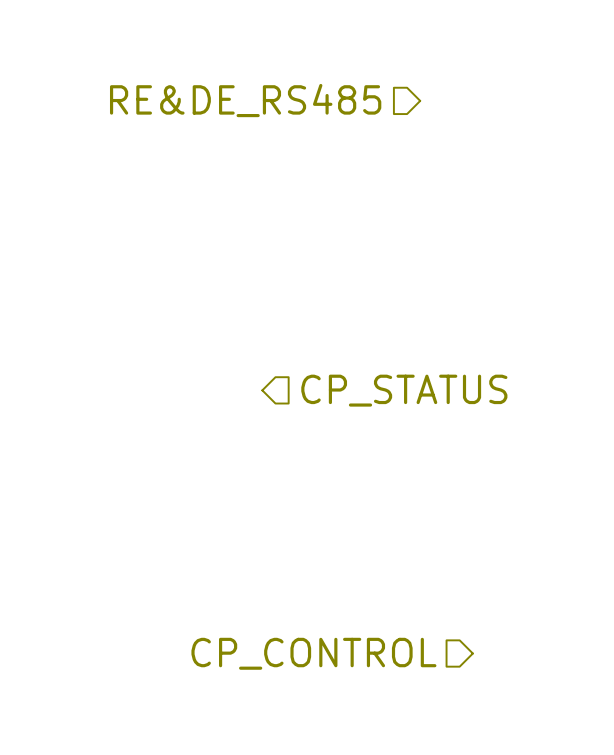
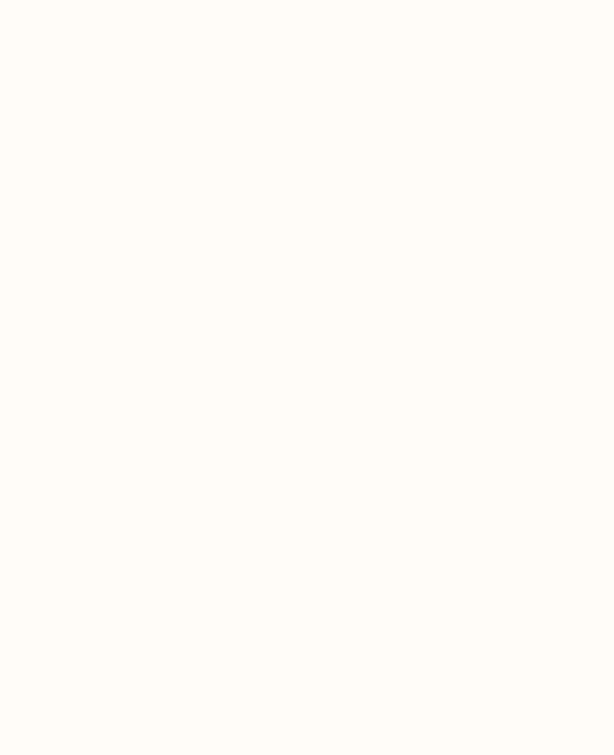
hierarchical label: RE&DE_RS485 (245, 100) -> none
hierarchical label: CP_STATUS (404, 390) -> none
hierarchical label: CP_CONTROL (313, 653) -> none

